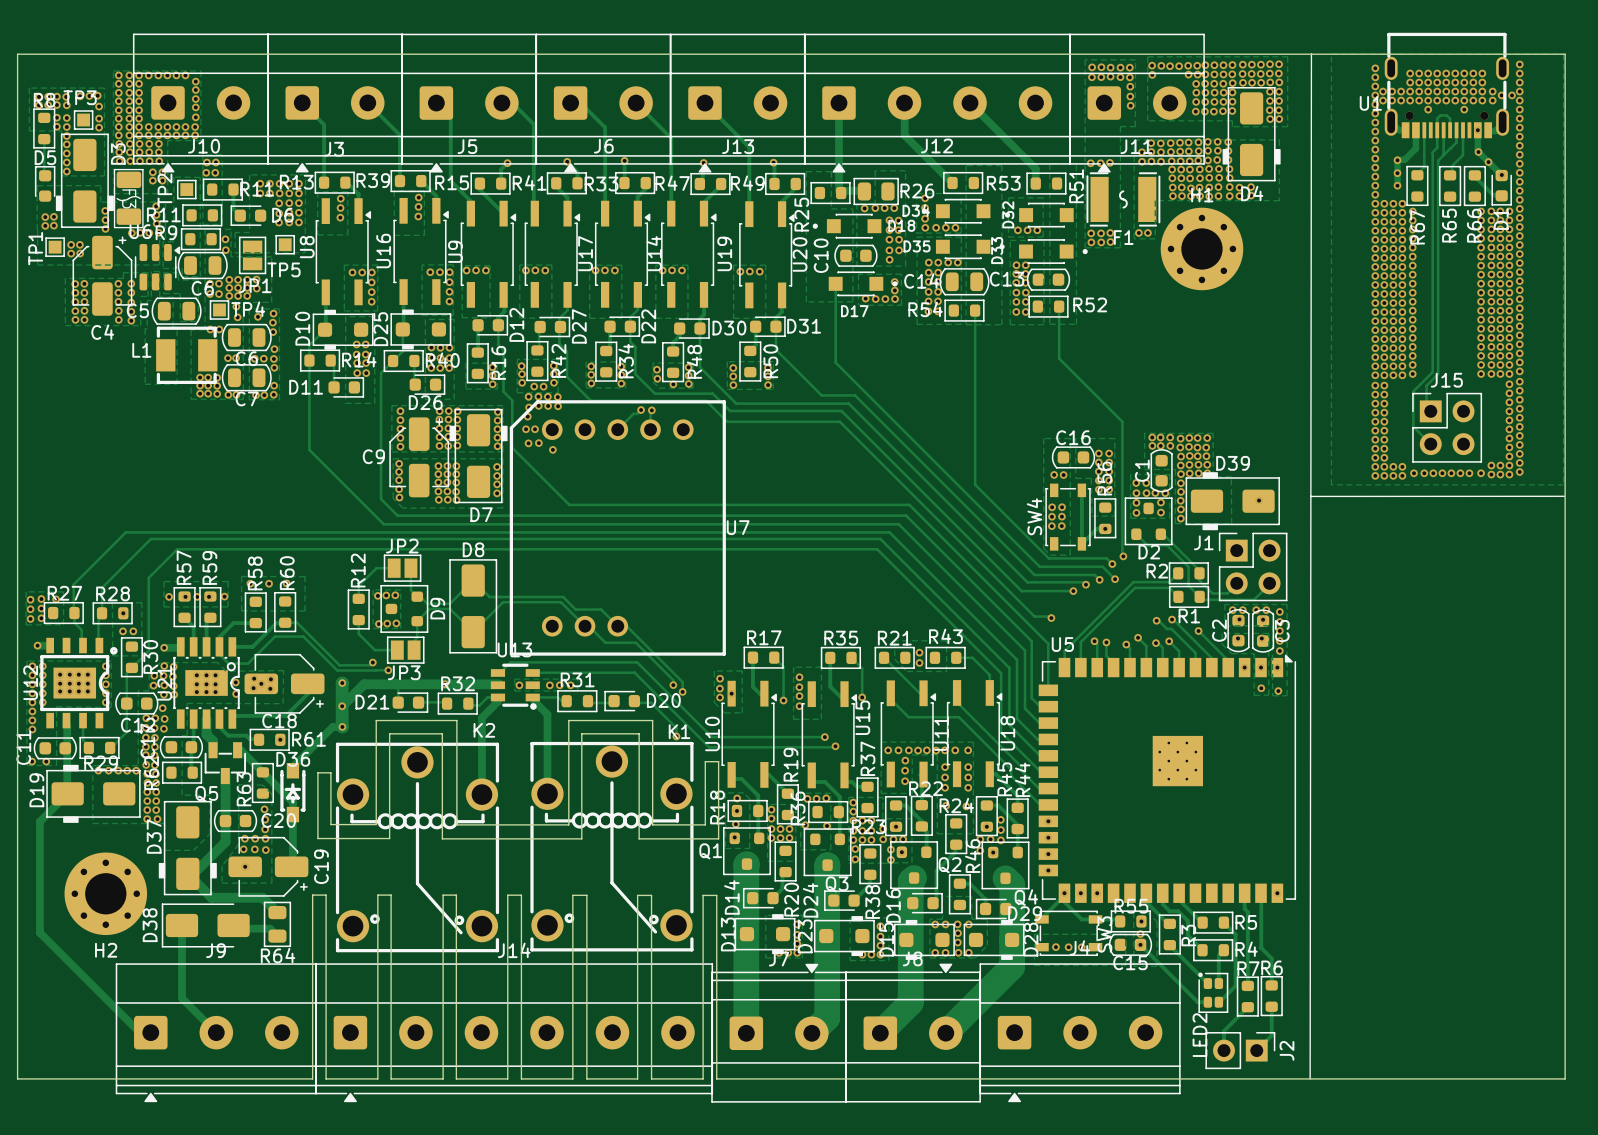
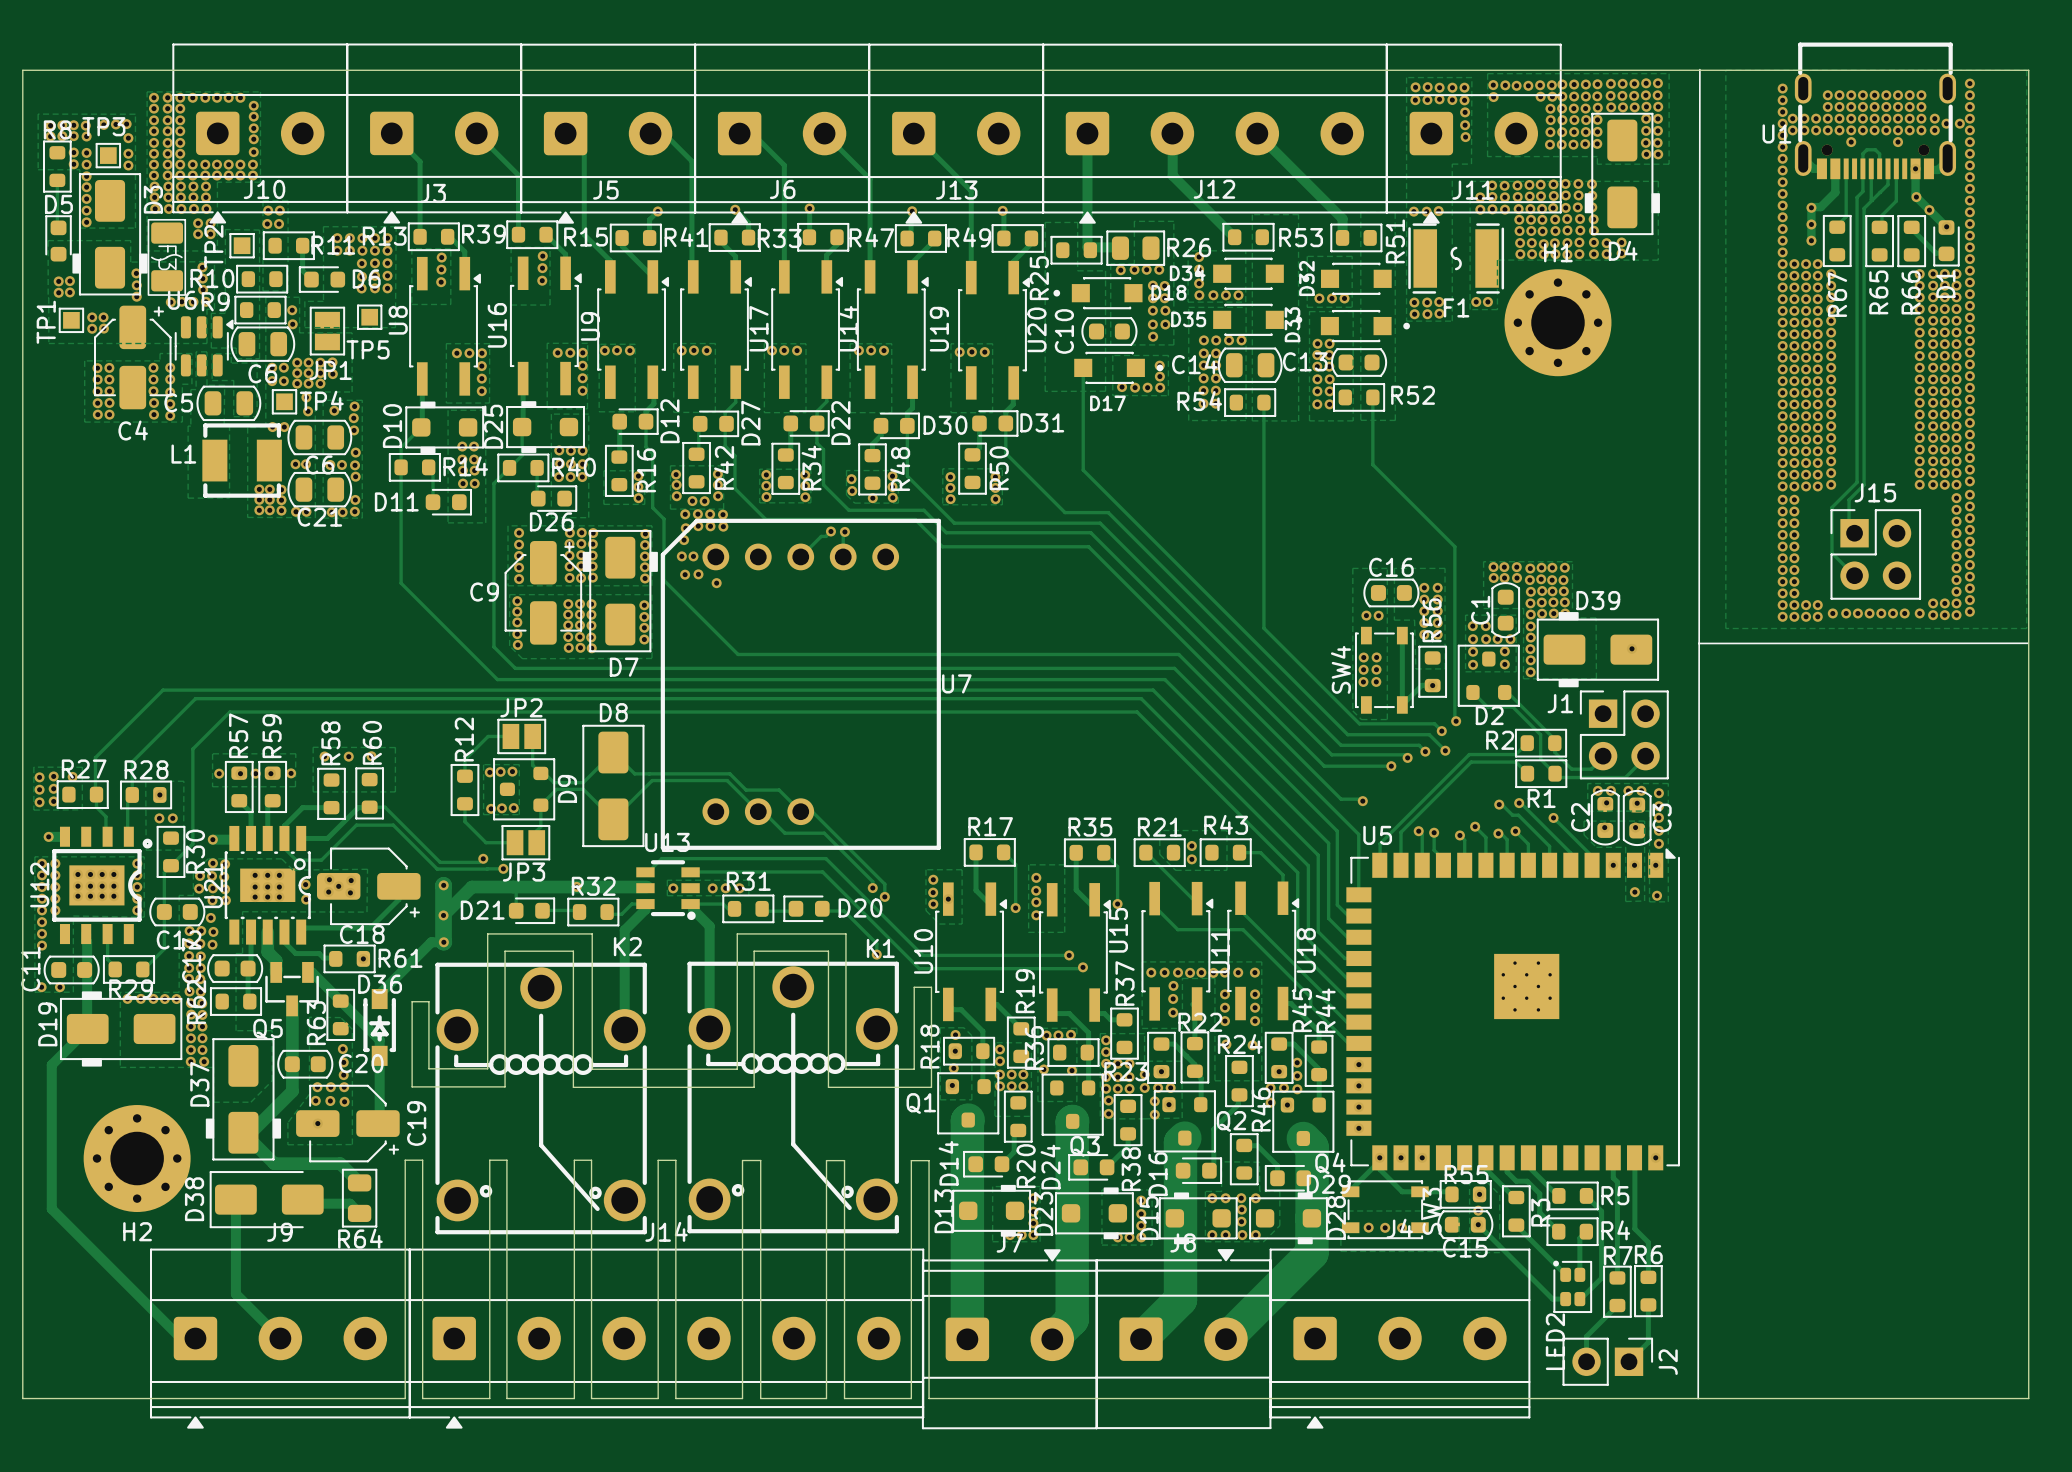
R11 name: R11 (163, 214) -> R10 (212, 278)
C7 name: C7 (247, 398) -> C21 (319, 517)

